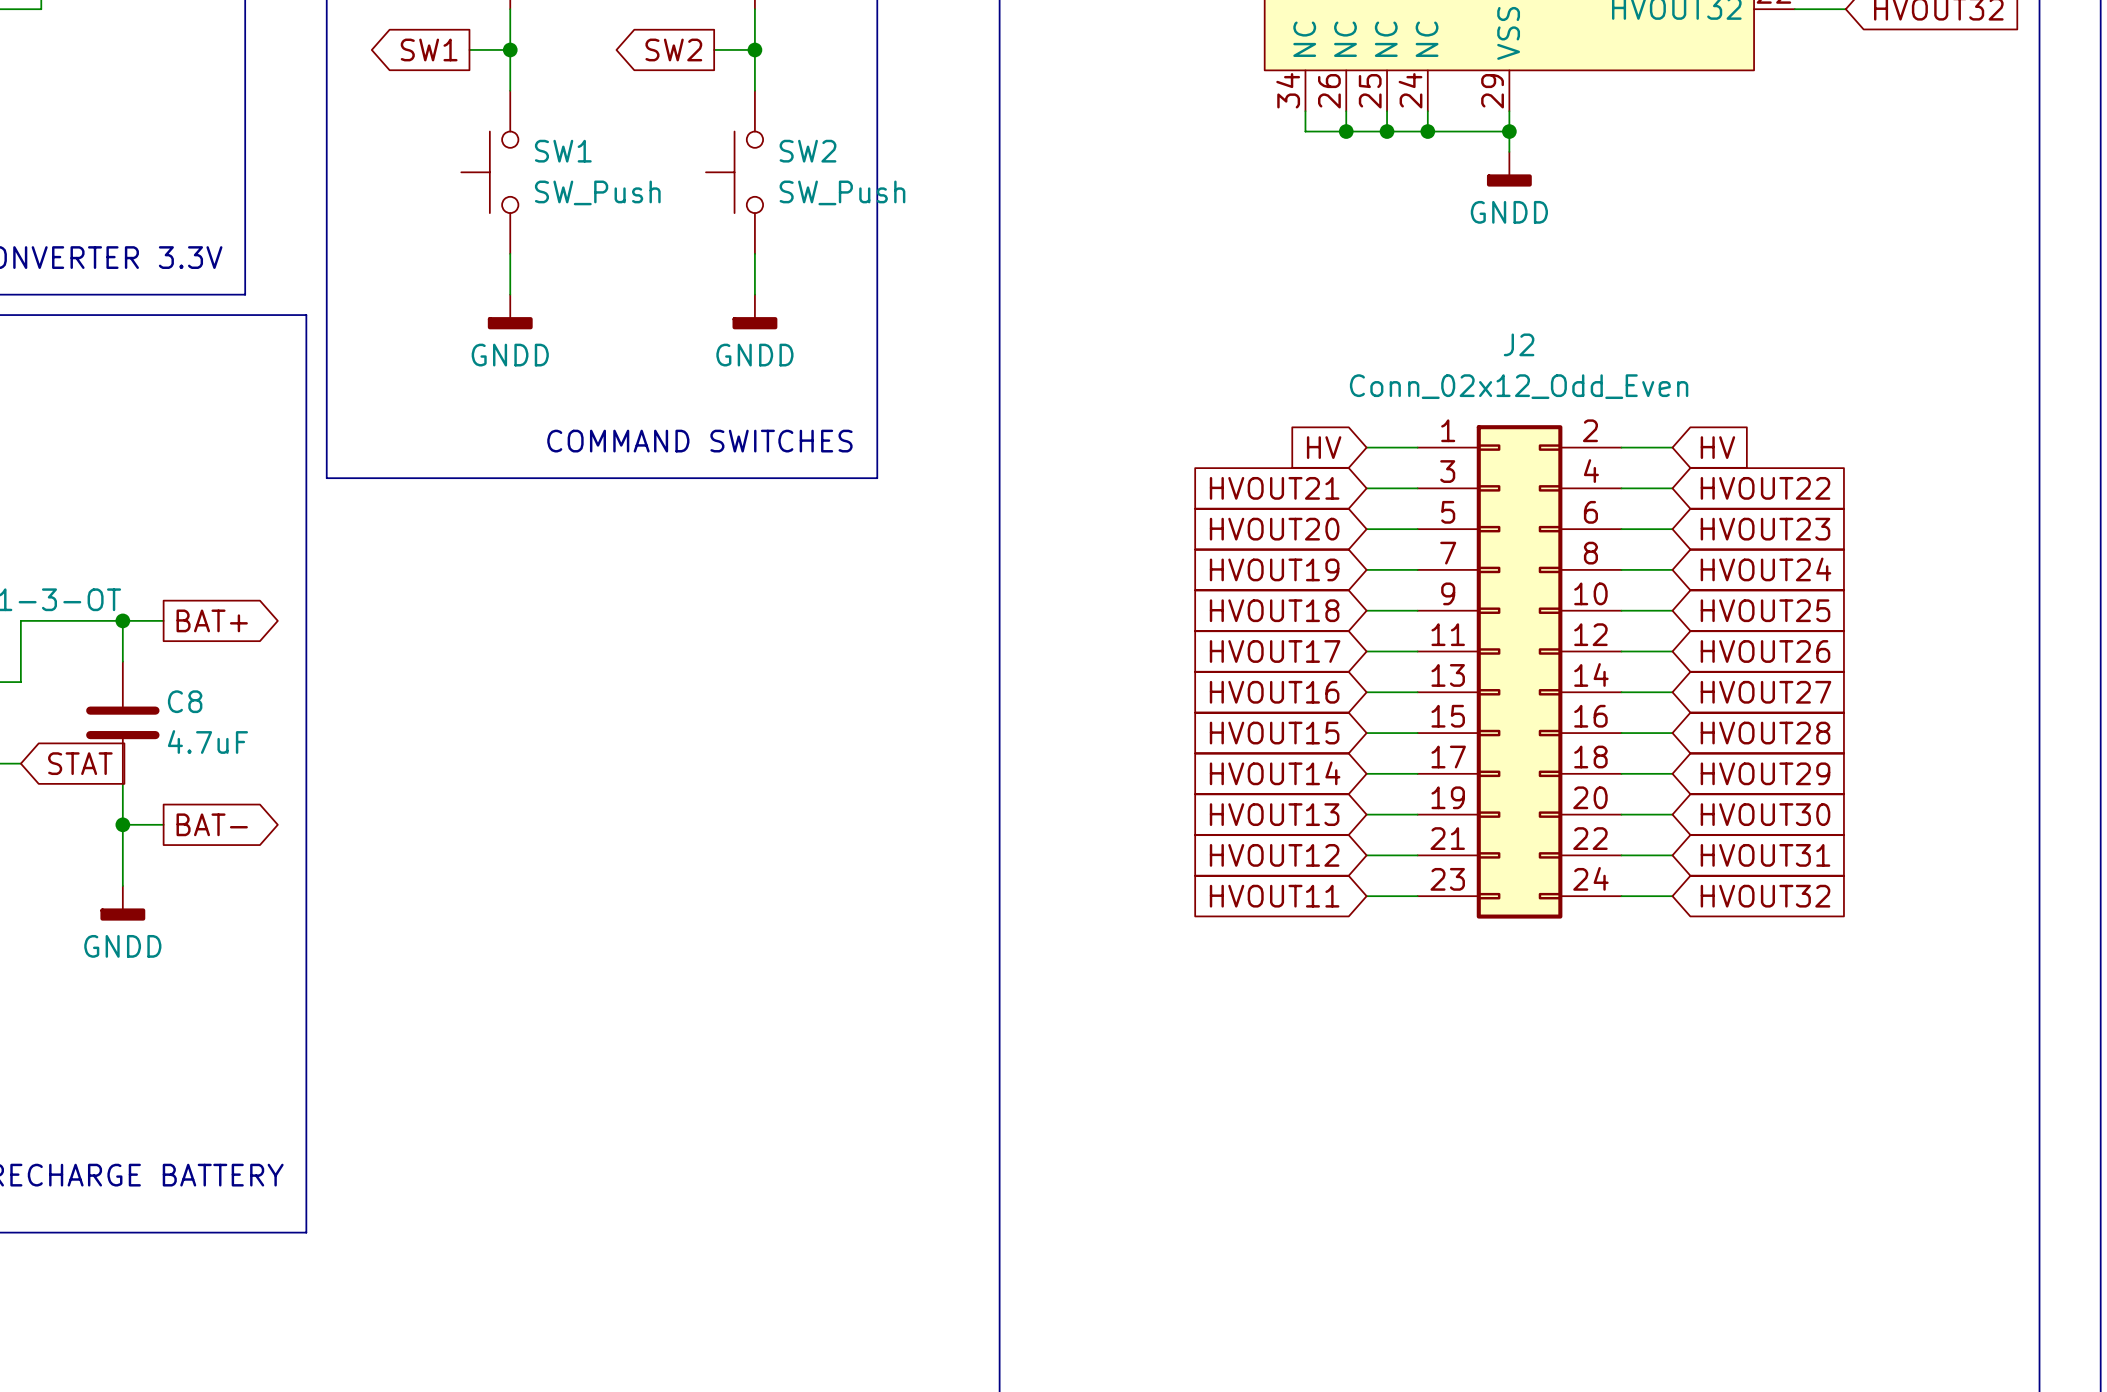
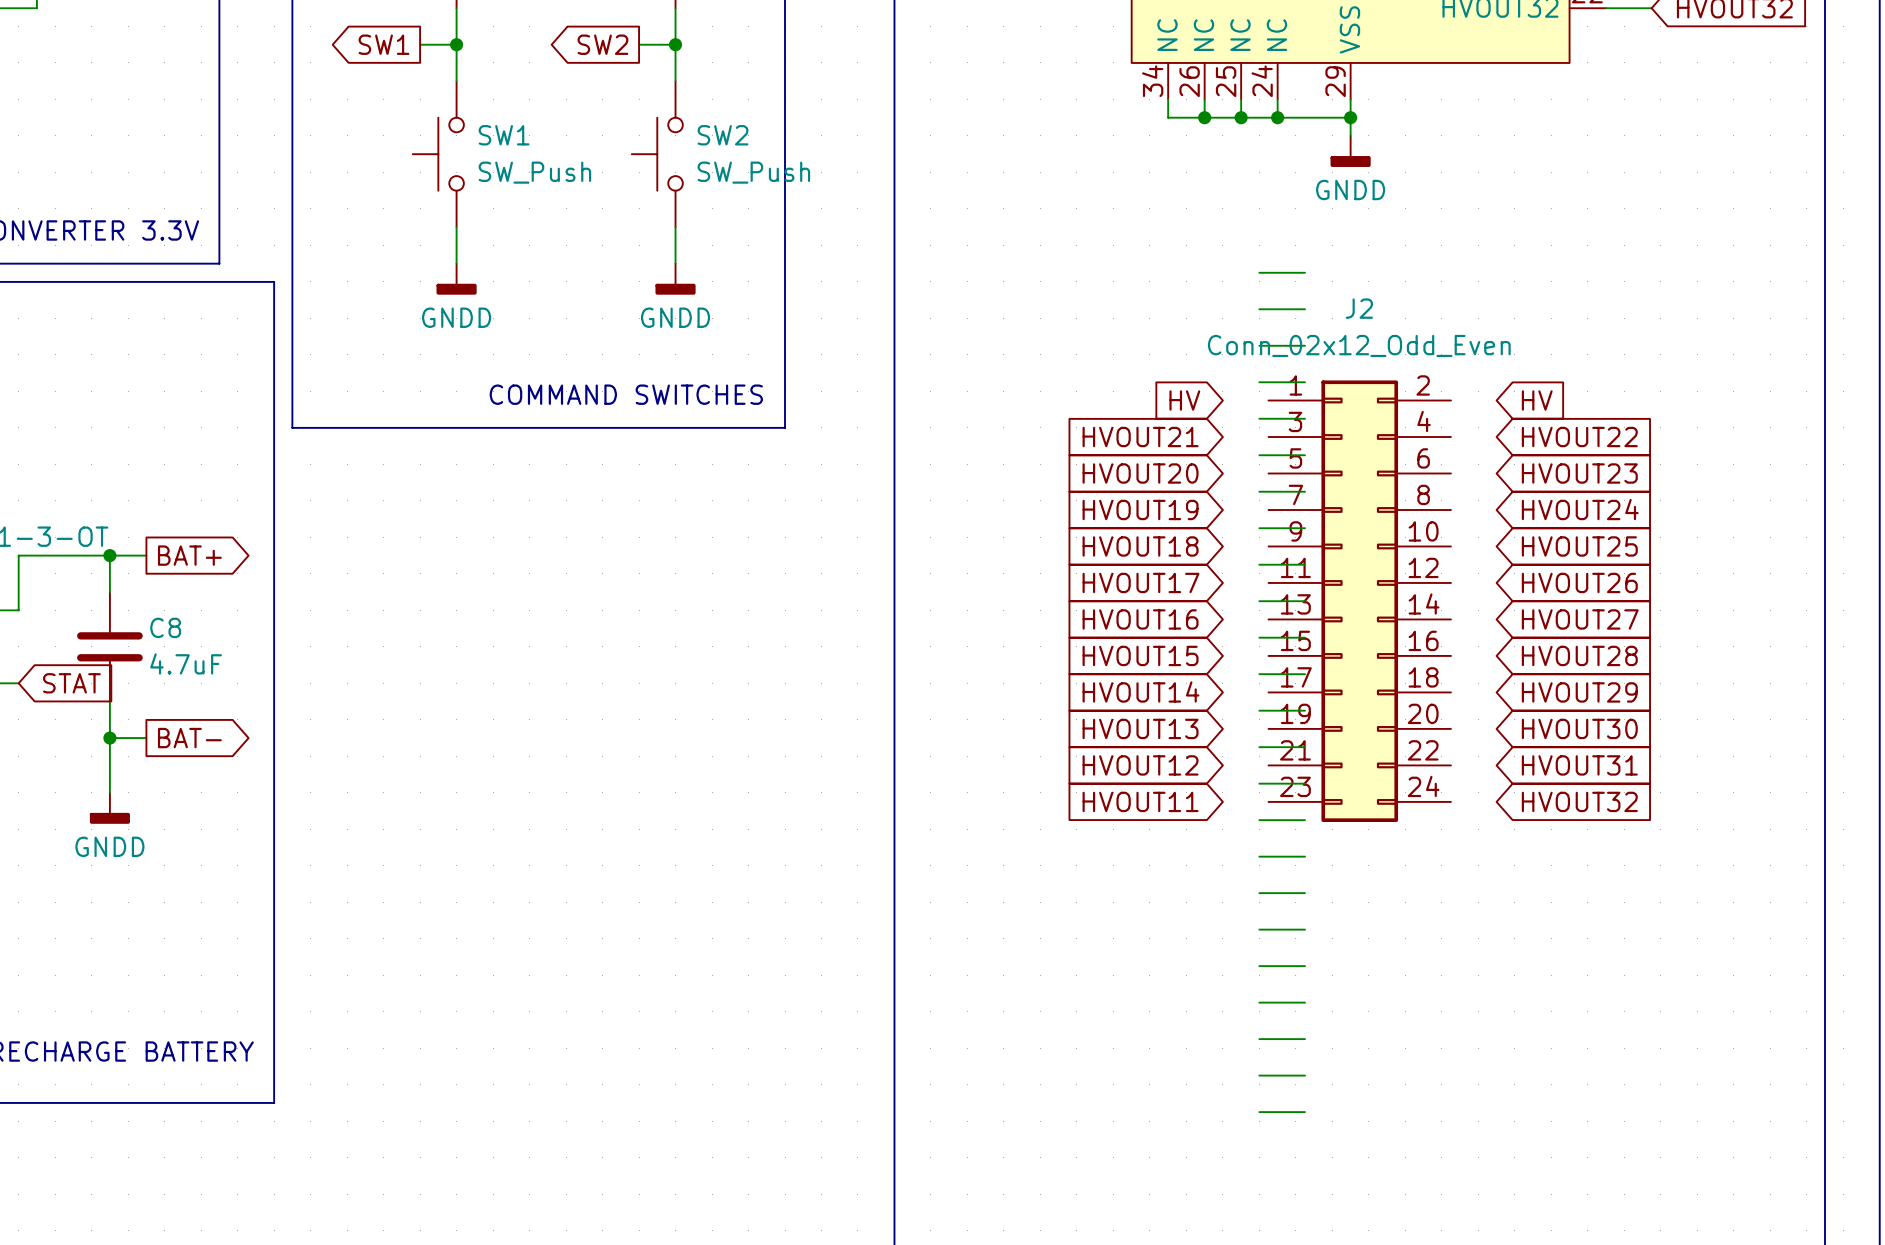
wire: (1366, 447) (1417, 447) -> (1259, 418) (1305, 418)
wire: (1621, 447) (1672, 447) -> (1259, 345) (1305, 345)
wire: (1366, 488) (1417, 488) -> (1259, 382) (1305, 382)
wire: (1621, 488) (1672, 488) -> (1259, 309) (1305, 309)
wire: (1366, 529) (1417, 529) -> (1259, 455) (1305, 455)
wire: (1621, 529) (1672, 529) -> (1259, 272) (1305, 272)
wire: (1366, 569) (1417, 569) -> (1259, 491) (1305, 491)
wire: (1621, 569) (1672, 569) -> none
wire: (1366, 610) (1417, 610) -> (1259, 528) (1305, 528)
wire: (1621, 610) (1672, 610) -> (1259, 564) (1305, 564)
wire: (1366, 651) (1417, 651) -> (1259, 601) (1305, 601)
wire: (1621, 651) (1672, 651) -> none
wire: (1366, 692) (1417, 692) -> (1259, 637) (1305, 637)
wire: (1621, 692) (1672, 692) -> none
wire: (1366, 733) (1417, 733) -> (1259, 674) (1305, 674)
wire: (1621, 733) (1672, 733) -> none
wire: (1366, 773) (1417, 773) -> (1259, 710) (1305, 710)
wire: (1621, 773) (1672, 773) -> (1259, 966) (1305, 966)
wire: (1366, 814) (1417, 814) -> (1259, 820) (1305, 820)
wire: (1621, 814) (1672, 814) -> (1259, 929) (1305, 929)
wire: (1366, 855) (1417, 855) -> (1259, 747) (1305, 747)
wire: (1621, 855) (1672, 855) -> (1259, 893) (1305, 893)
wire: (1366, 896) (1417, 896) -> (1259, 783) (1305, 783)
wire: (1621, 896) (1672, 896) -> (1259, 856) (1305, 856)
wire: none -> (1259, 1002) (1305, 1002)
wire: none -> (1259, 1039) (1305, 1039)
wire: none -> (1259, 1075) (1305, 1075)
wire: none -> (1259, 1112) (1305, 1112)

